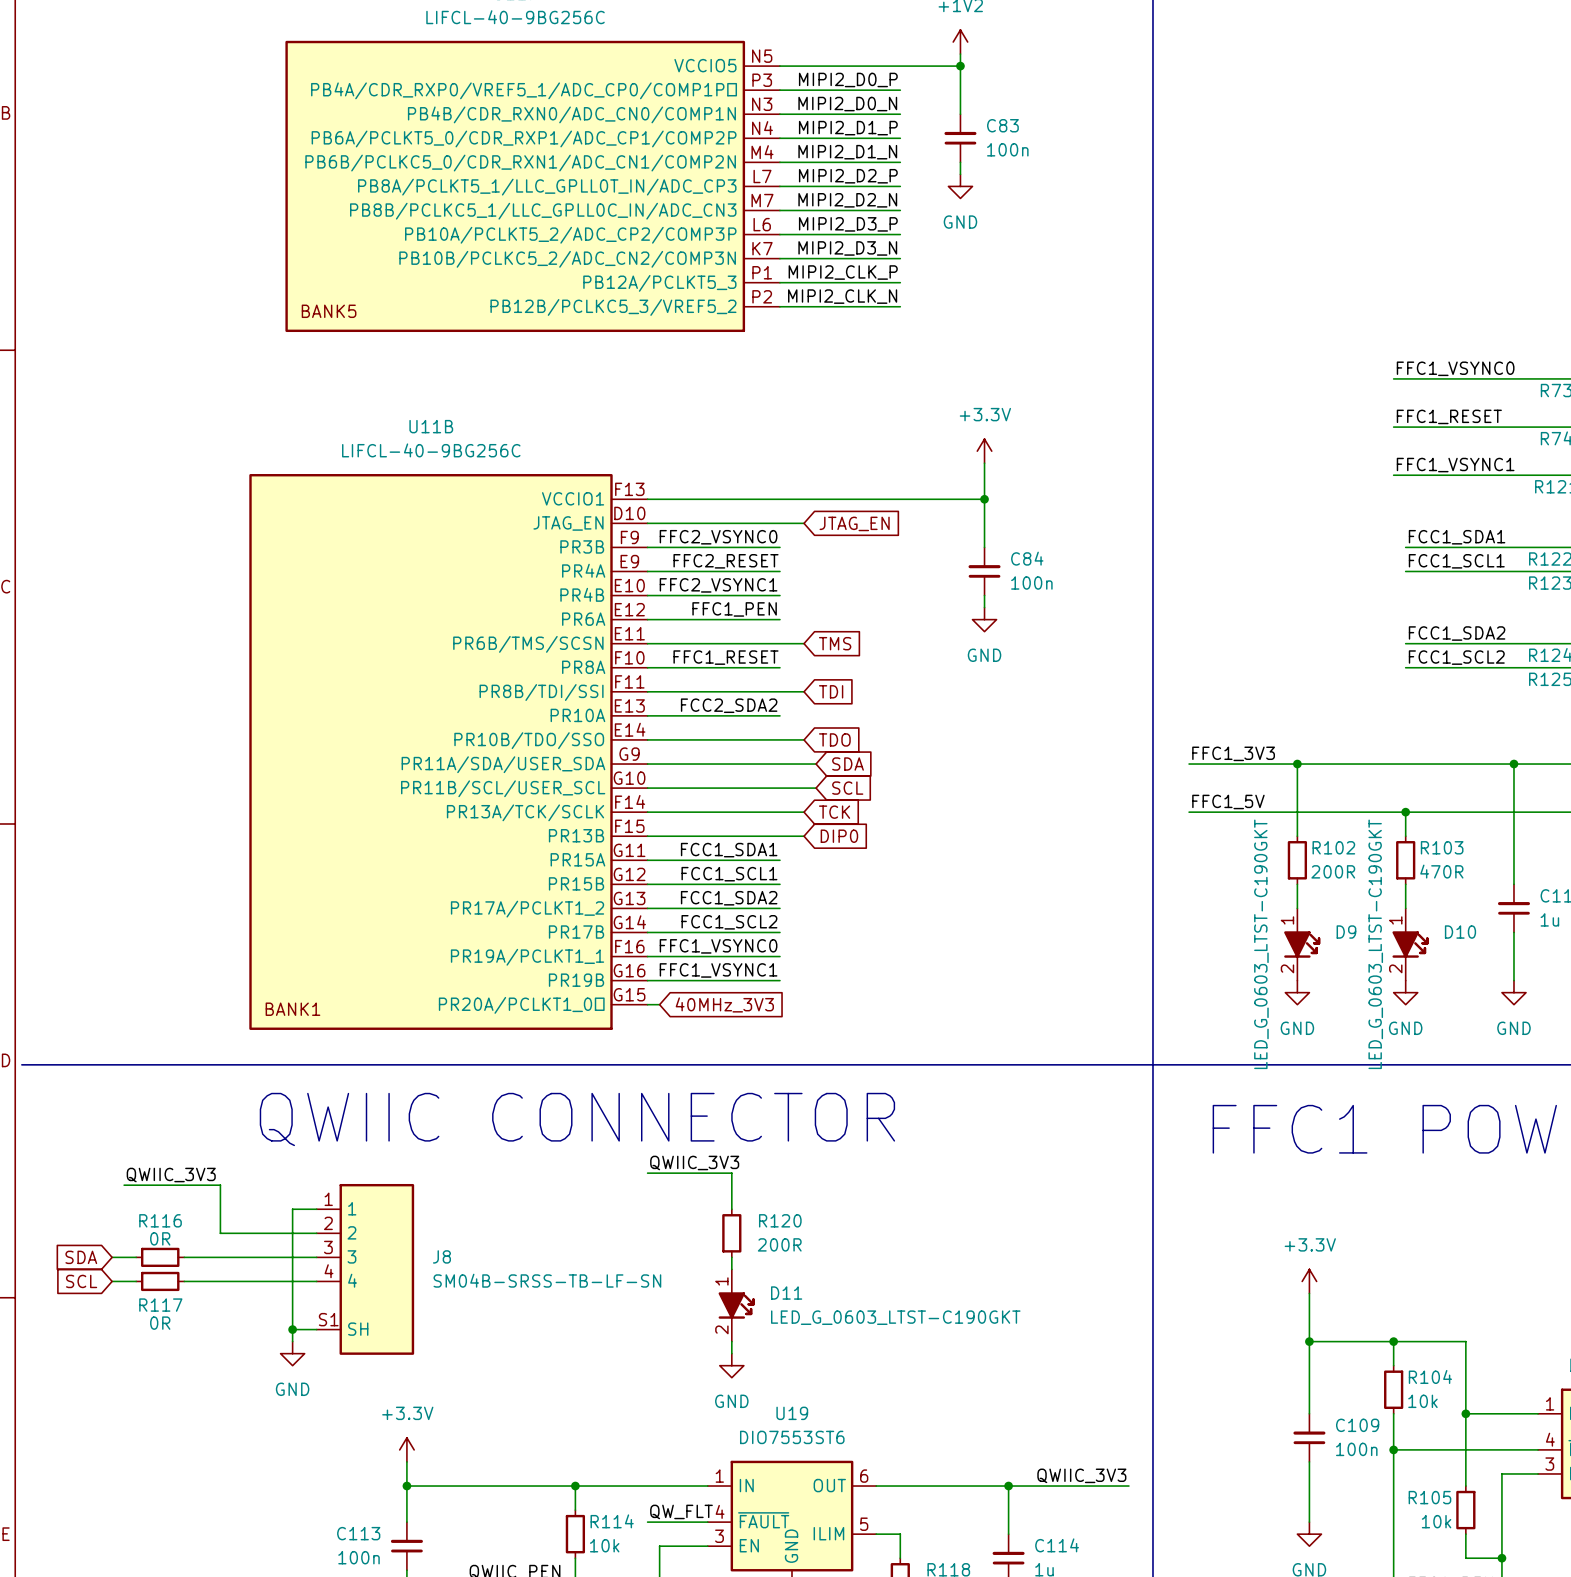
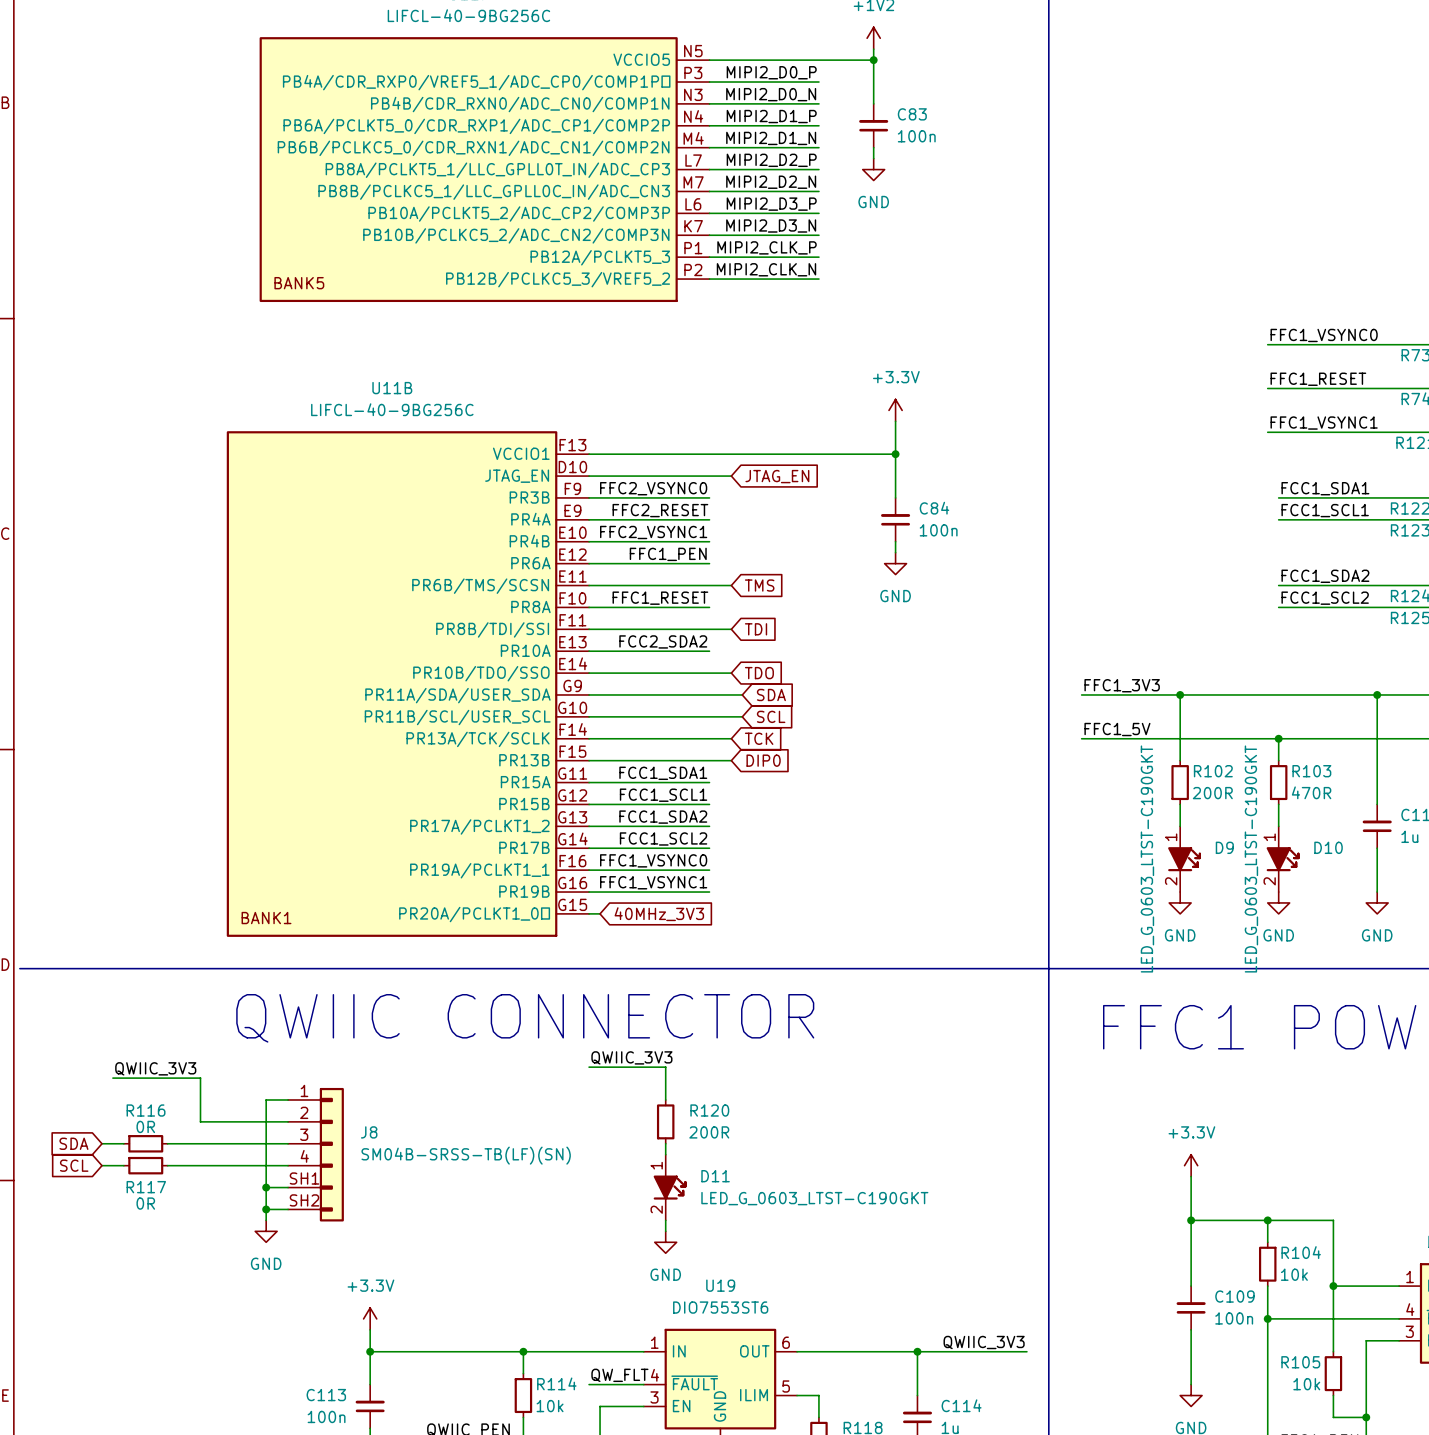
J8 symbol: [316, 1183, 415, 1355] -> [288, 1087, 344, 1222]
J8 name position: J8 (441, 1256) -> J8 (369, 1132)
J8 text: none -> SM04B-SRSS-TB(LF)(SN) (466, 1155)
J8 value: SM04B-SRSS-TB-LF-SN (547, 1280) -> none
wire: none -> (266, 1187) (288, 1187)
junction: none -> (266, 1187)

